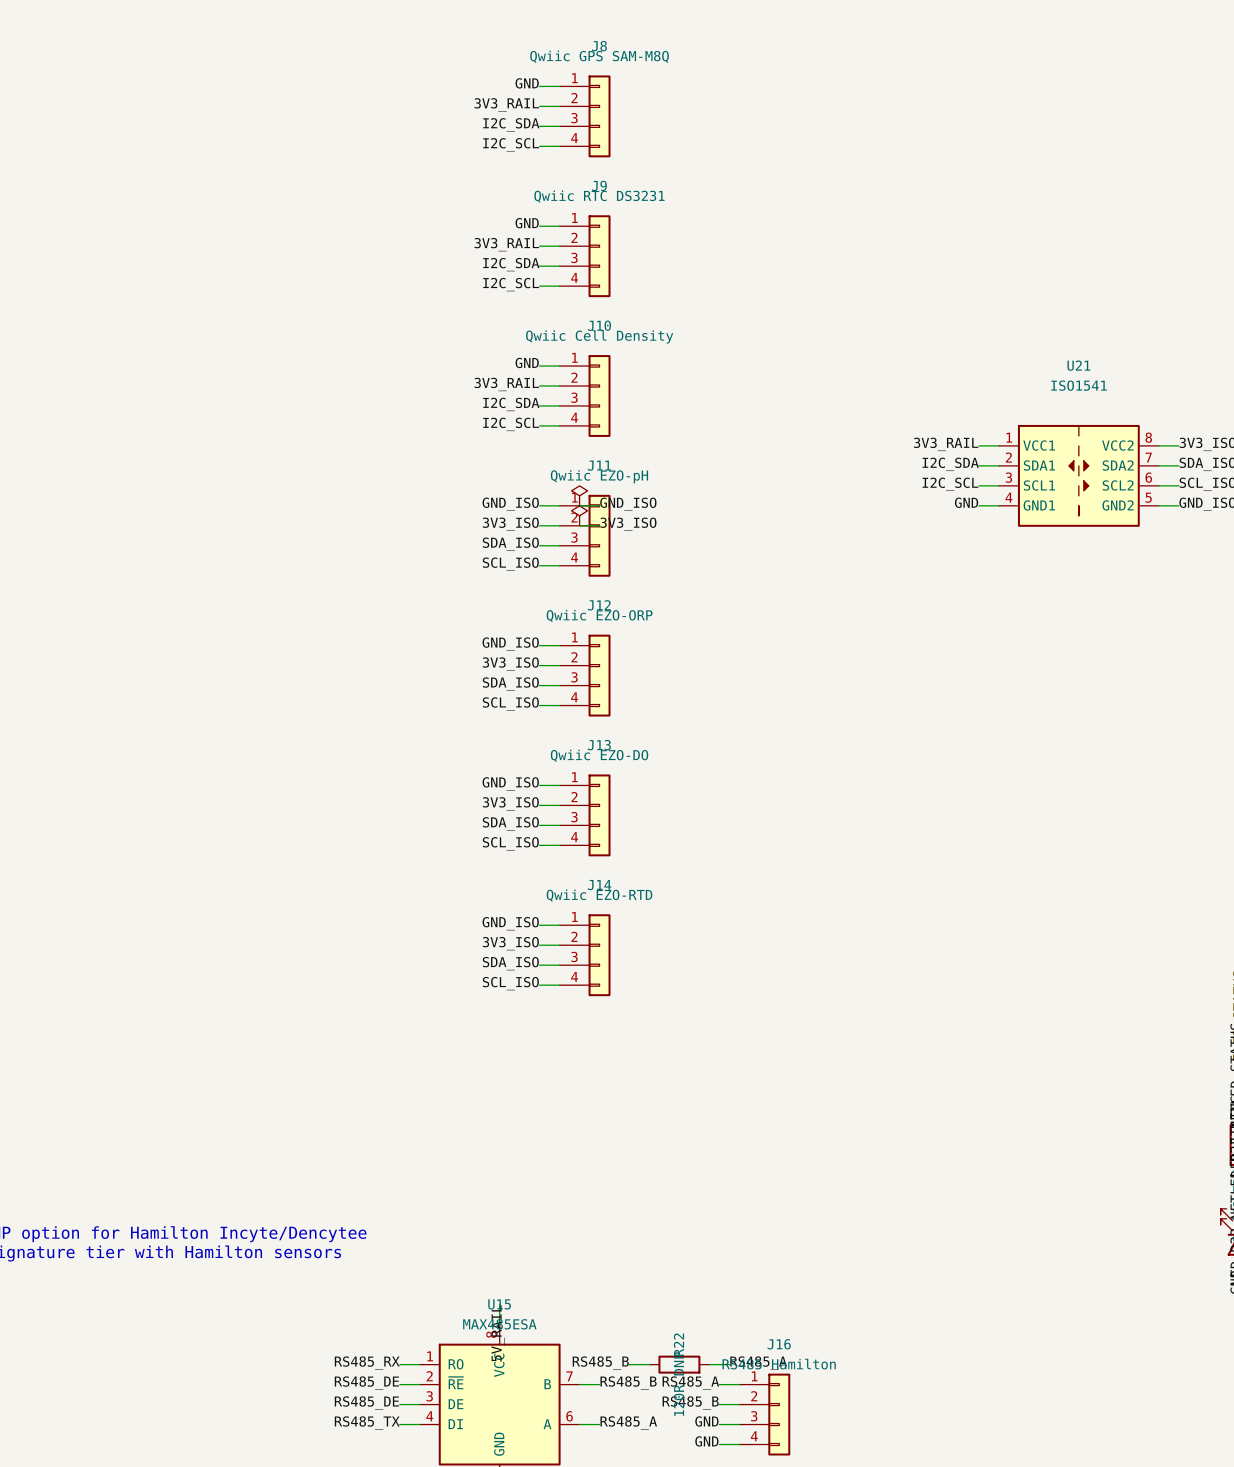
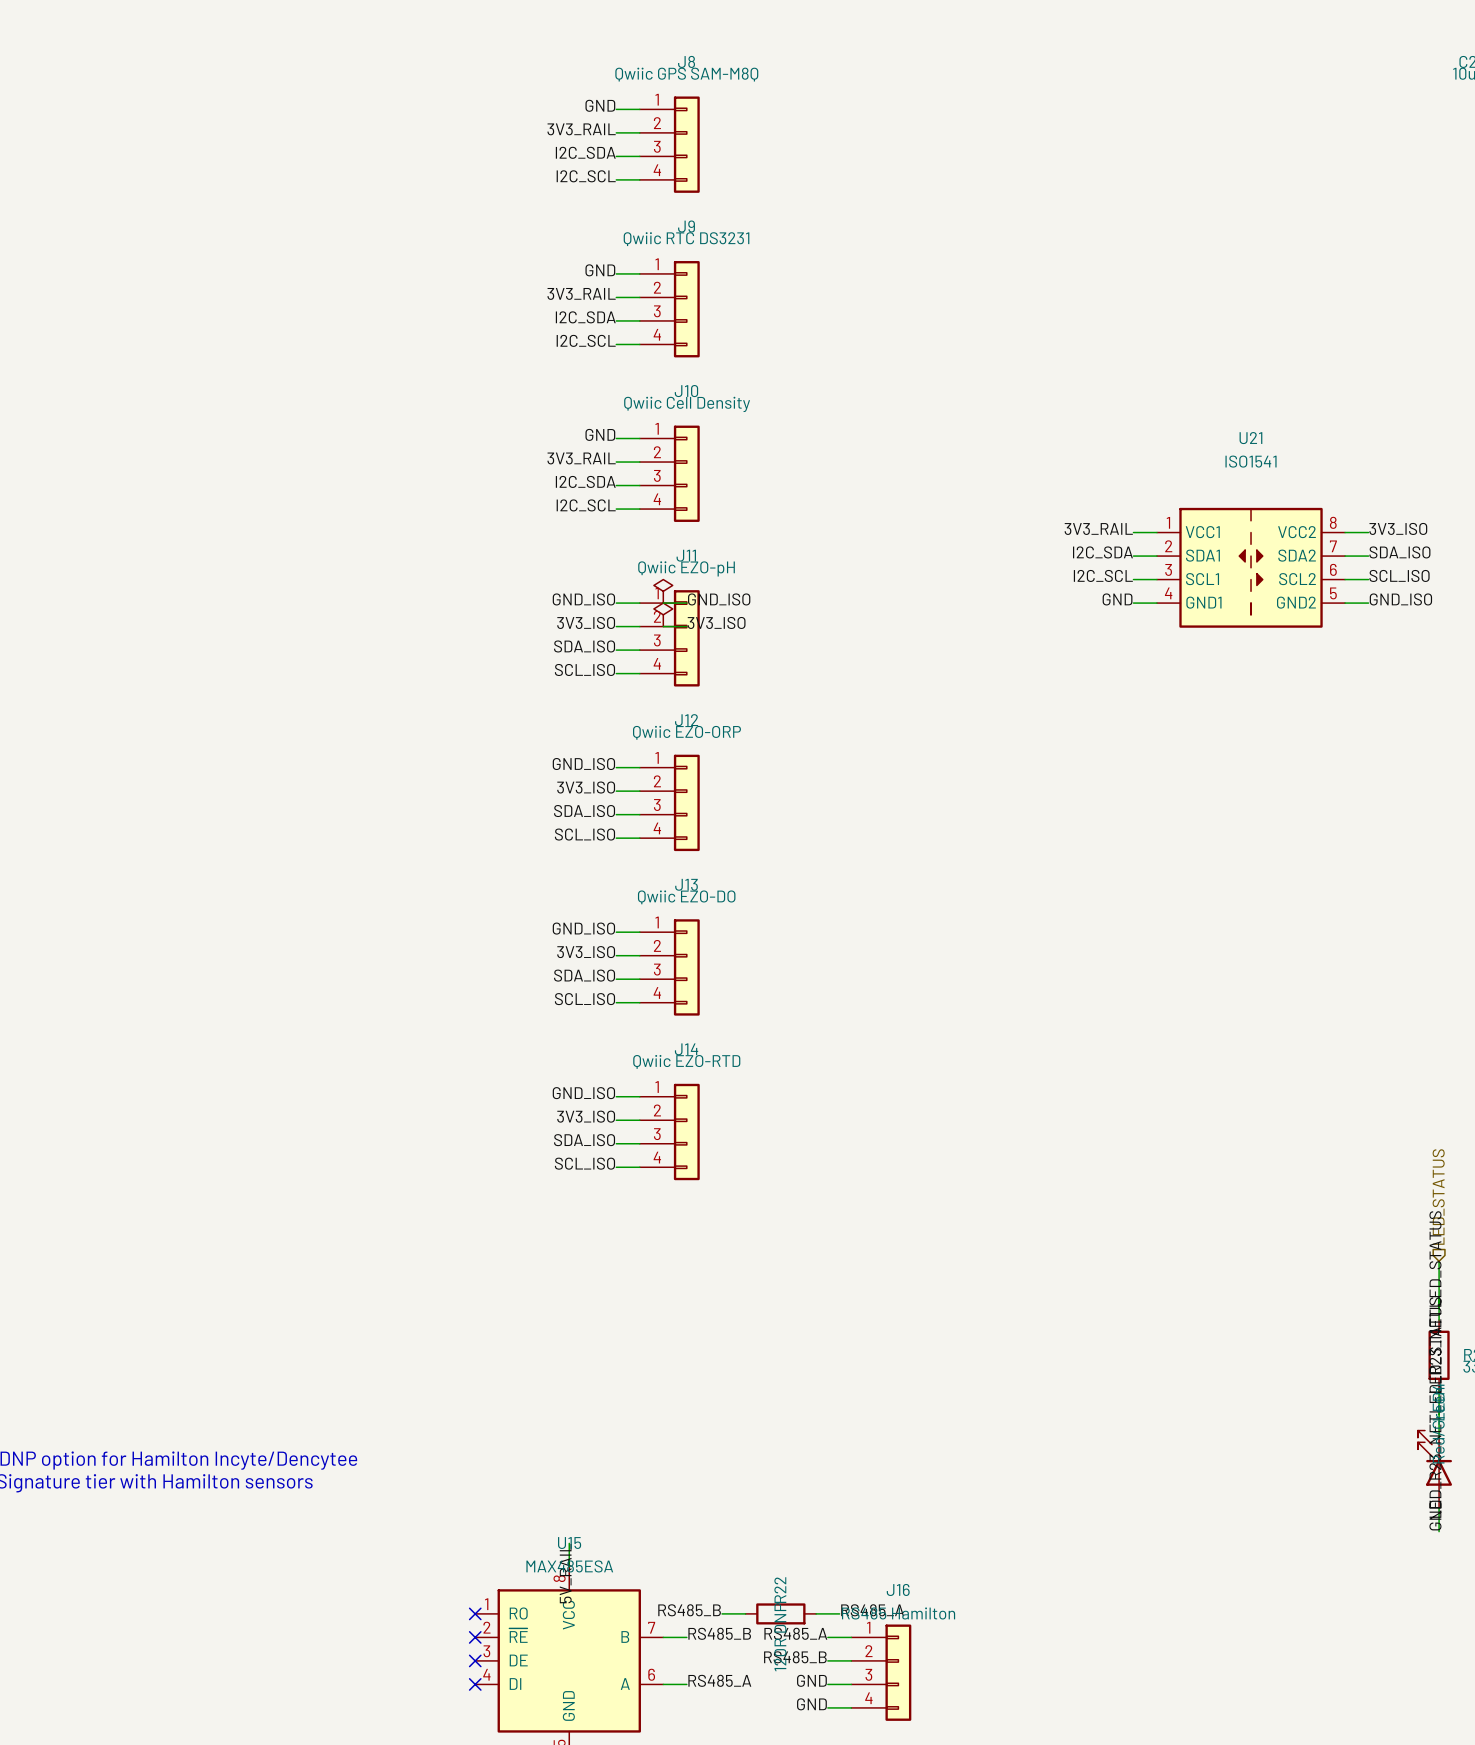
label: RS485_RX (367, 1363) -> none
wire: (399, 1364) (419, 1364) -> none
no-connect mark: none -> (475, 1613)
label: RS485_DE (366, 1383) -> none
wire: (399, 1384) (419, 1384) -> none
no-connect mark: none -> (475, 1637)
label: RS485_DE (366, 1403) -> none
wire: (399, 1404) (419, 1404) -> none
no-connect mark: none -> (475, 1660)
label: RS485_TX (367, 1422) -> none
wire: (399, 1424) (419, 1424) -> none
no-connect mark: none -> (475, 1684)

